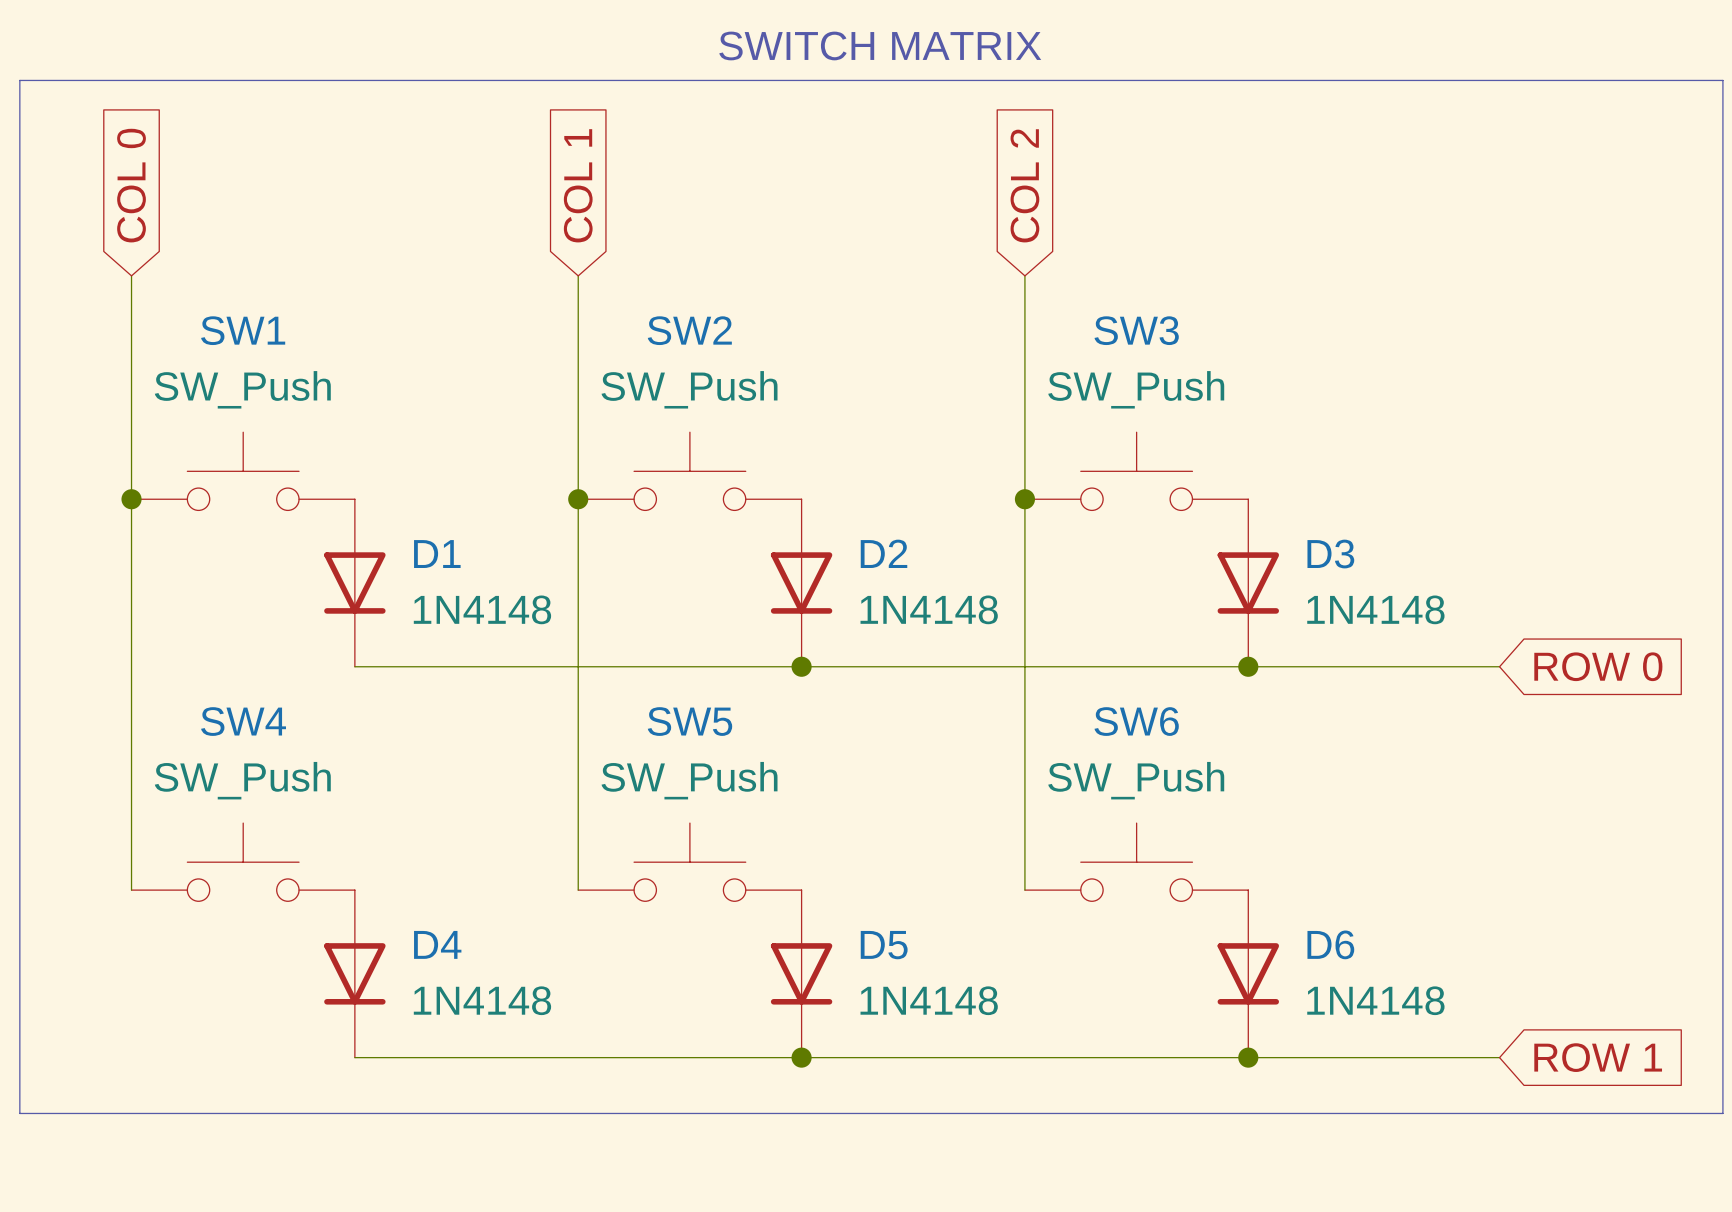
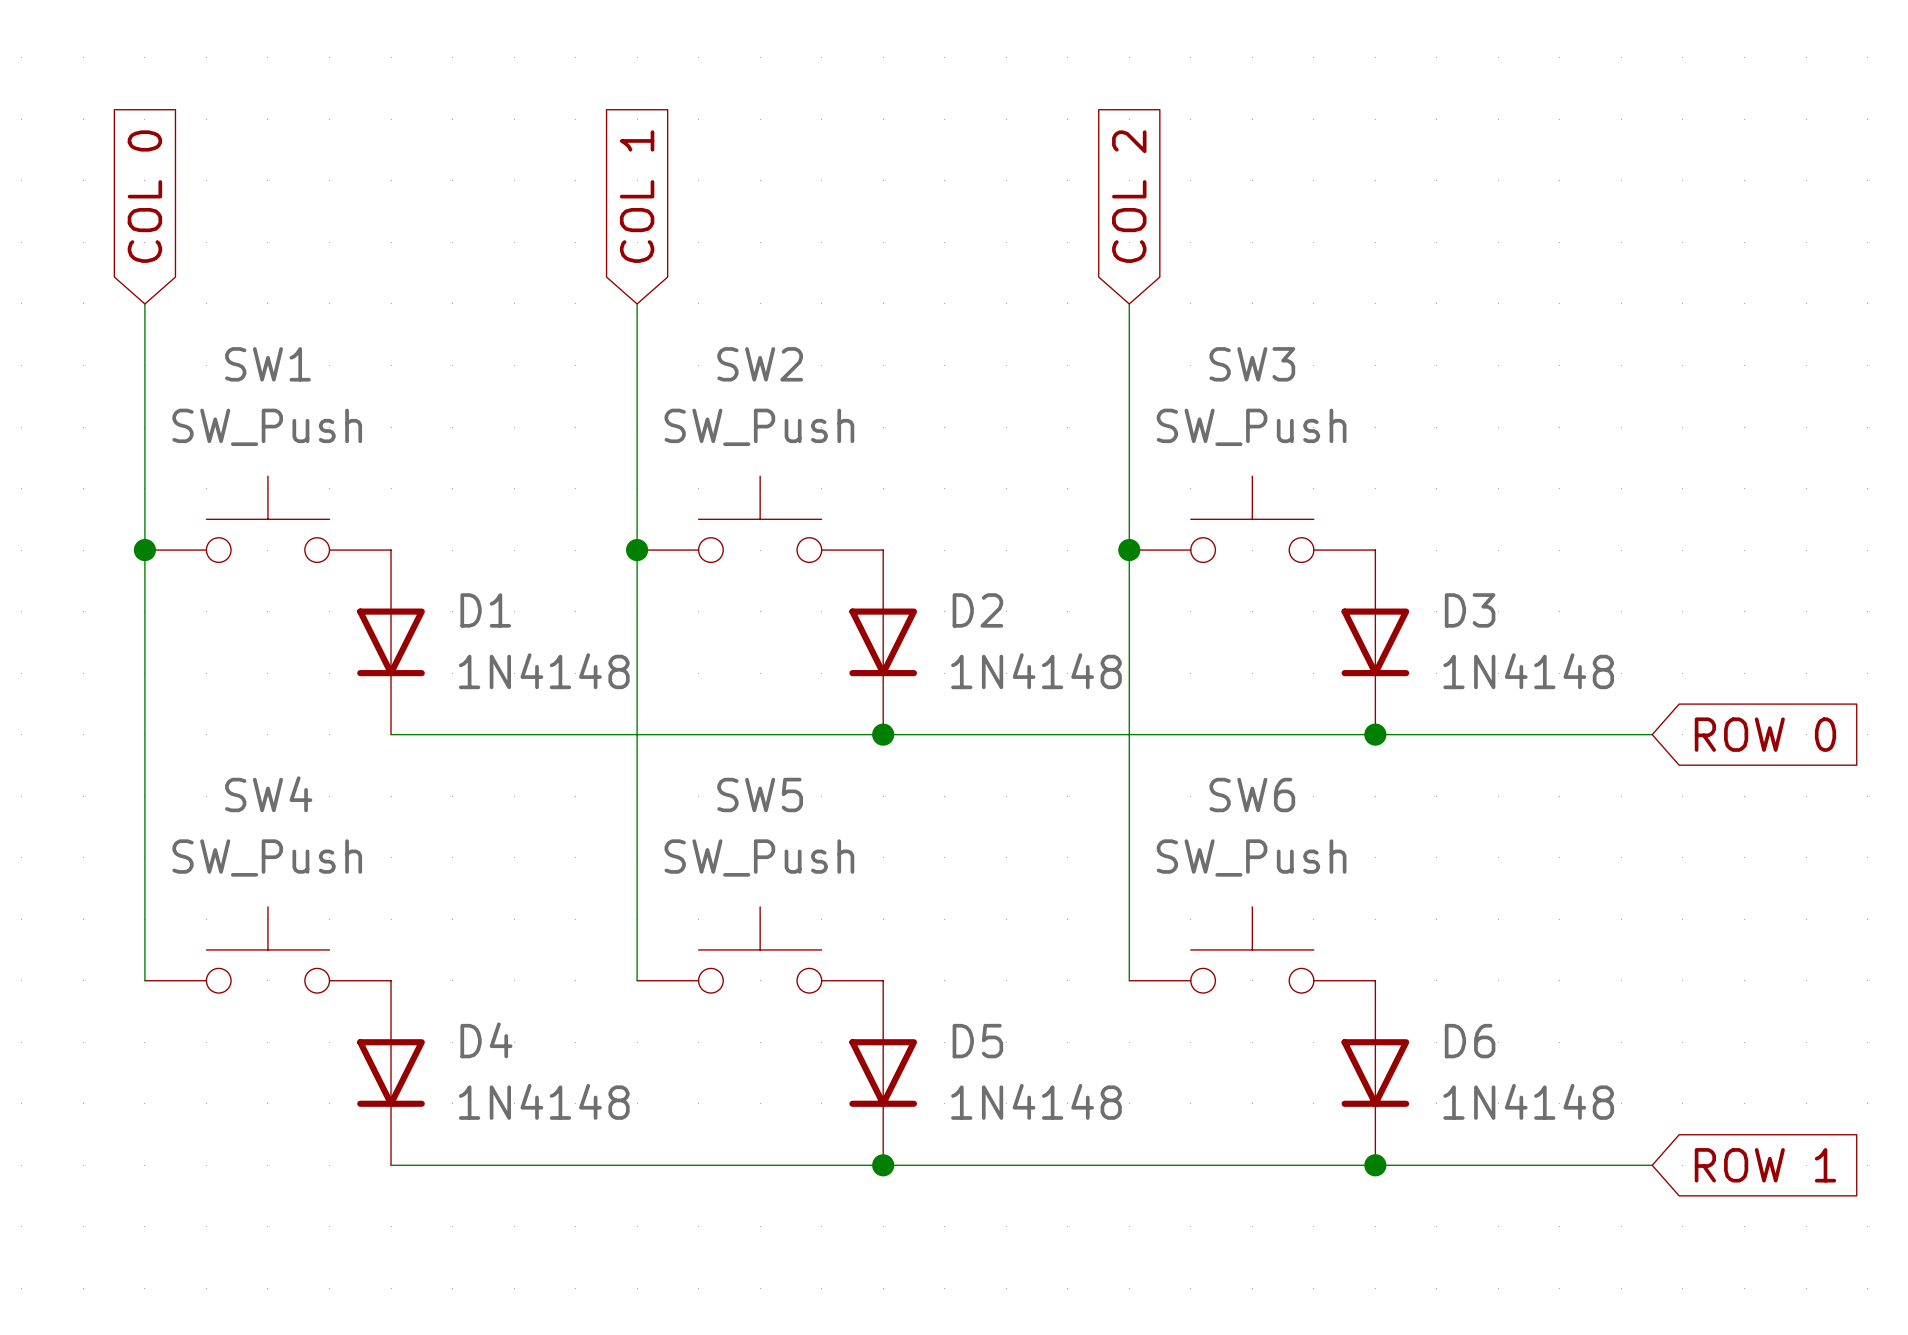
text: SWITCH MATRIX (880, 45) -> none
line: (19, 80) (1722, 80) (1722, 1113) (19, 1113) (19, 80) -> none

